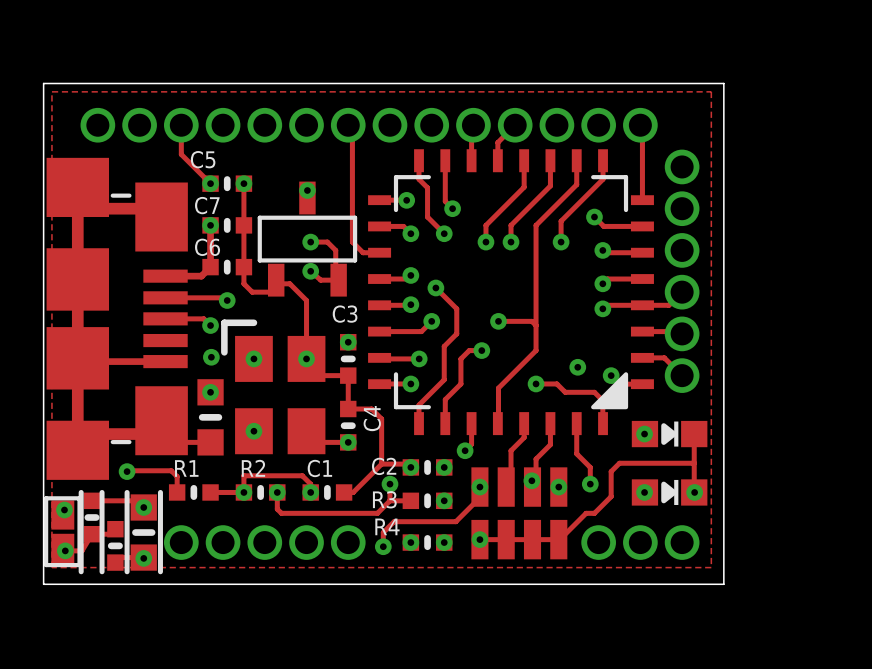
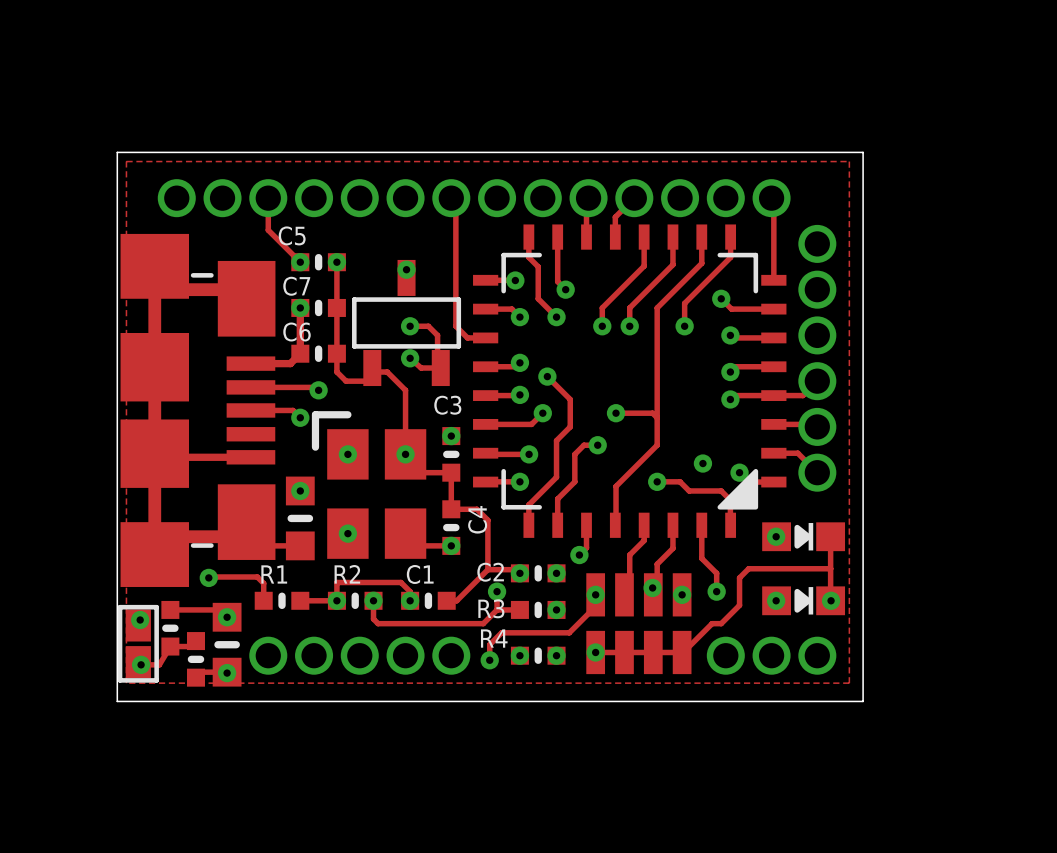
via: (211, 357) -> none
line: (81, 492) (81, 571) -> none
line: (102, 492) (102, 571) -> none
line: (127, 492) (127, 571) -> none
line: (160, 492) (160, 571) -> none

